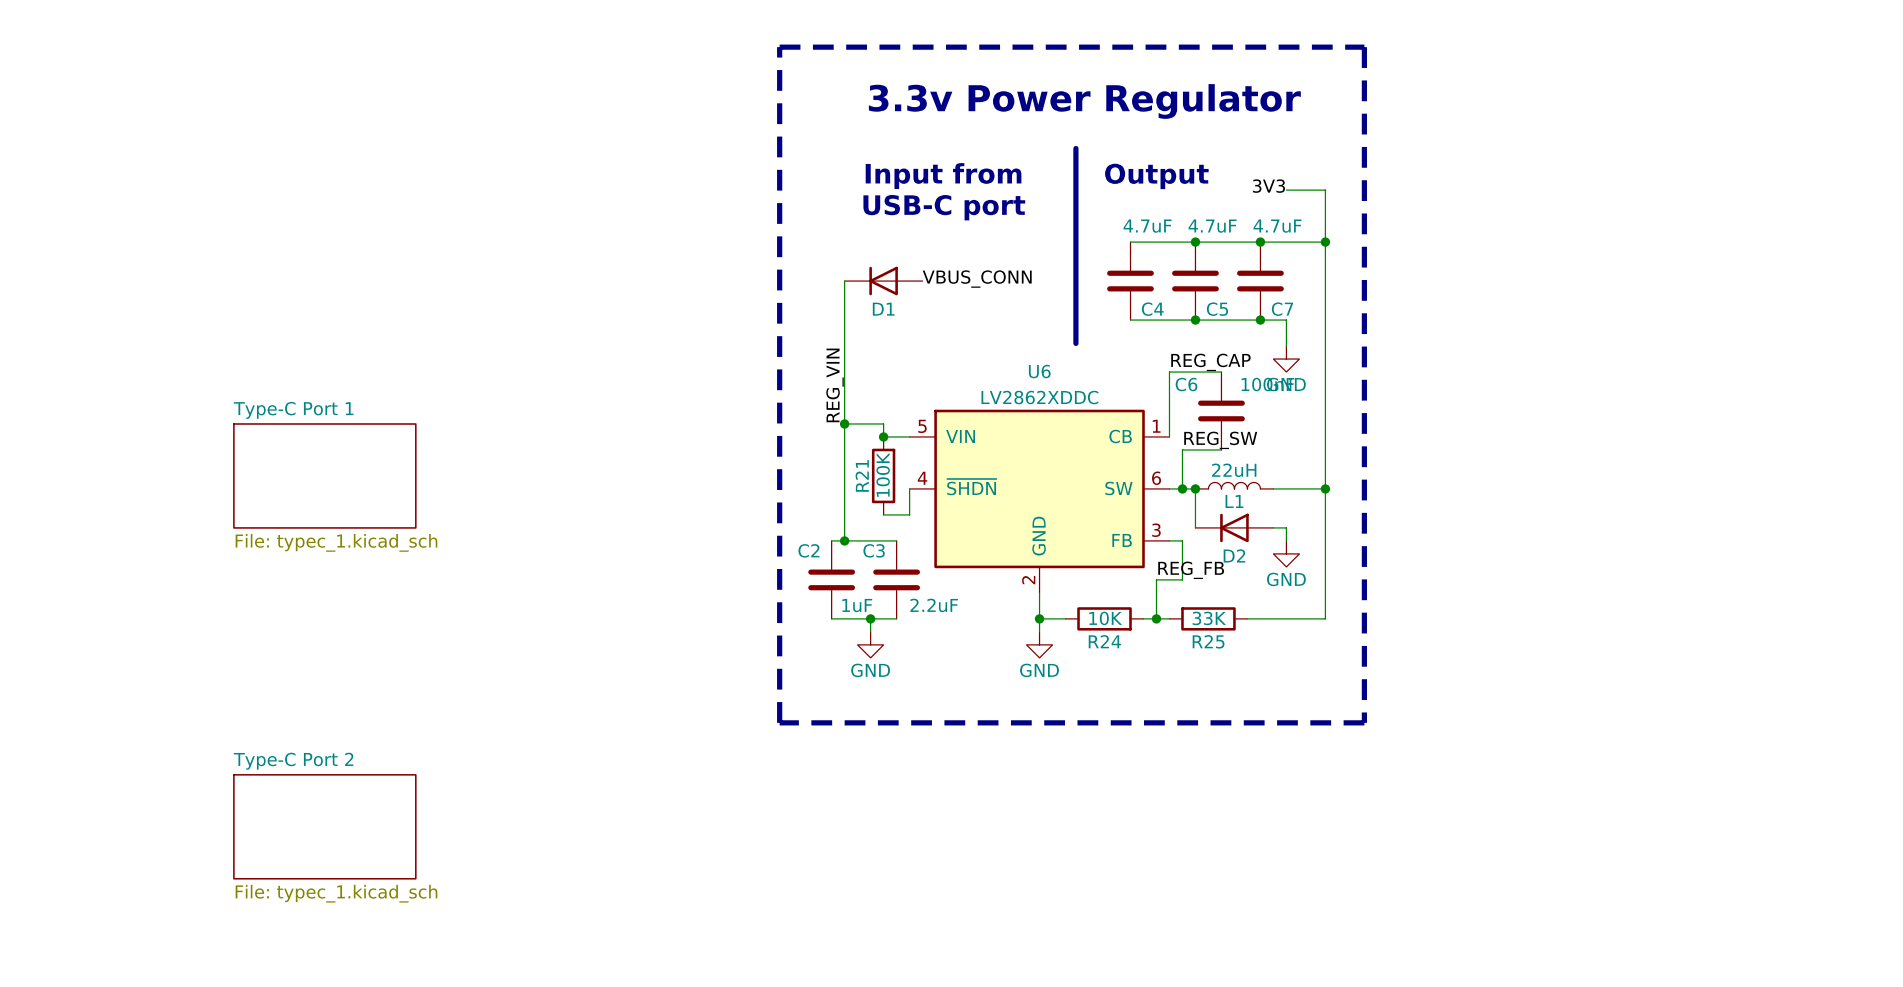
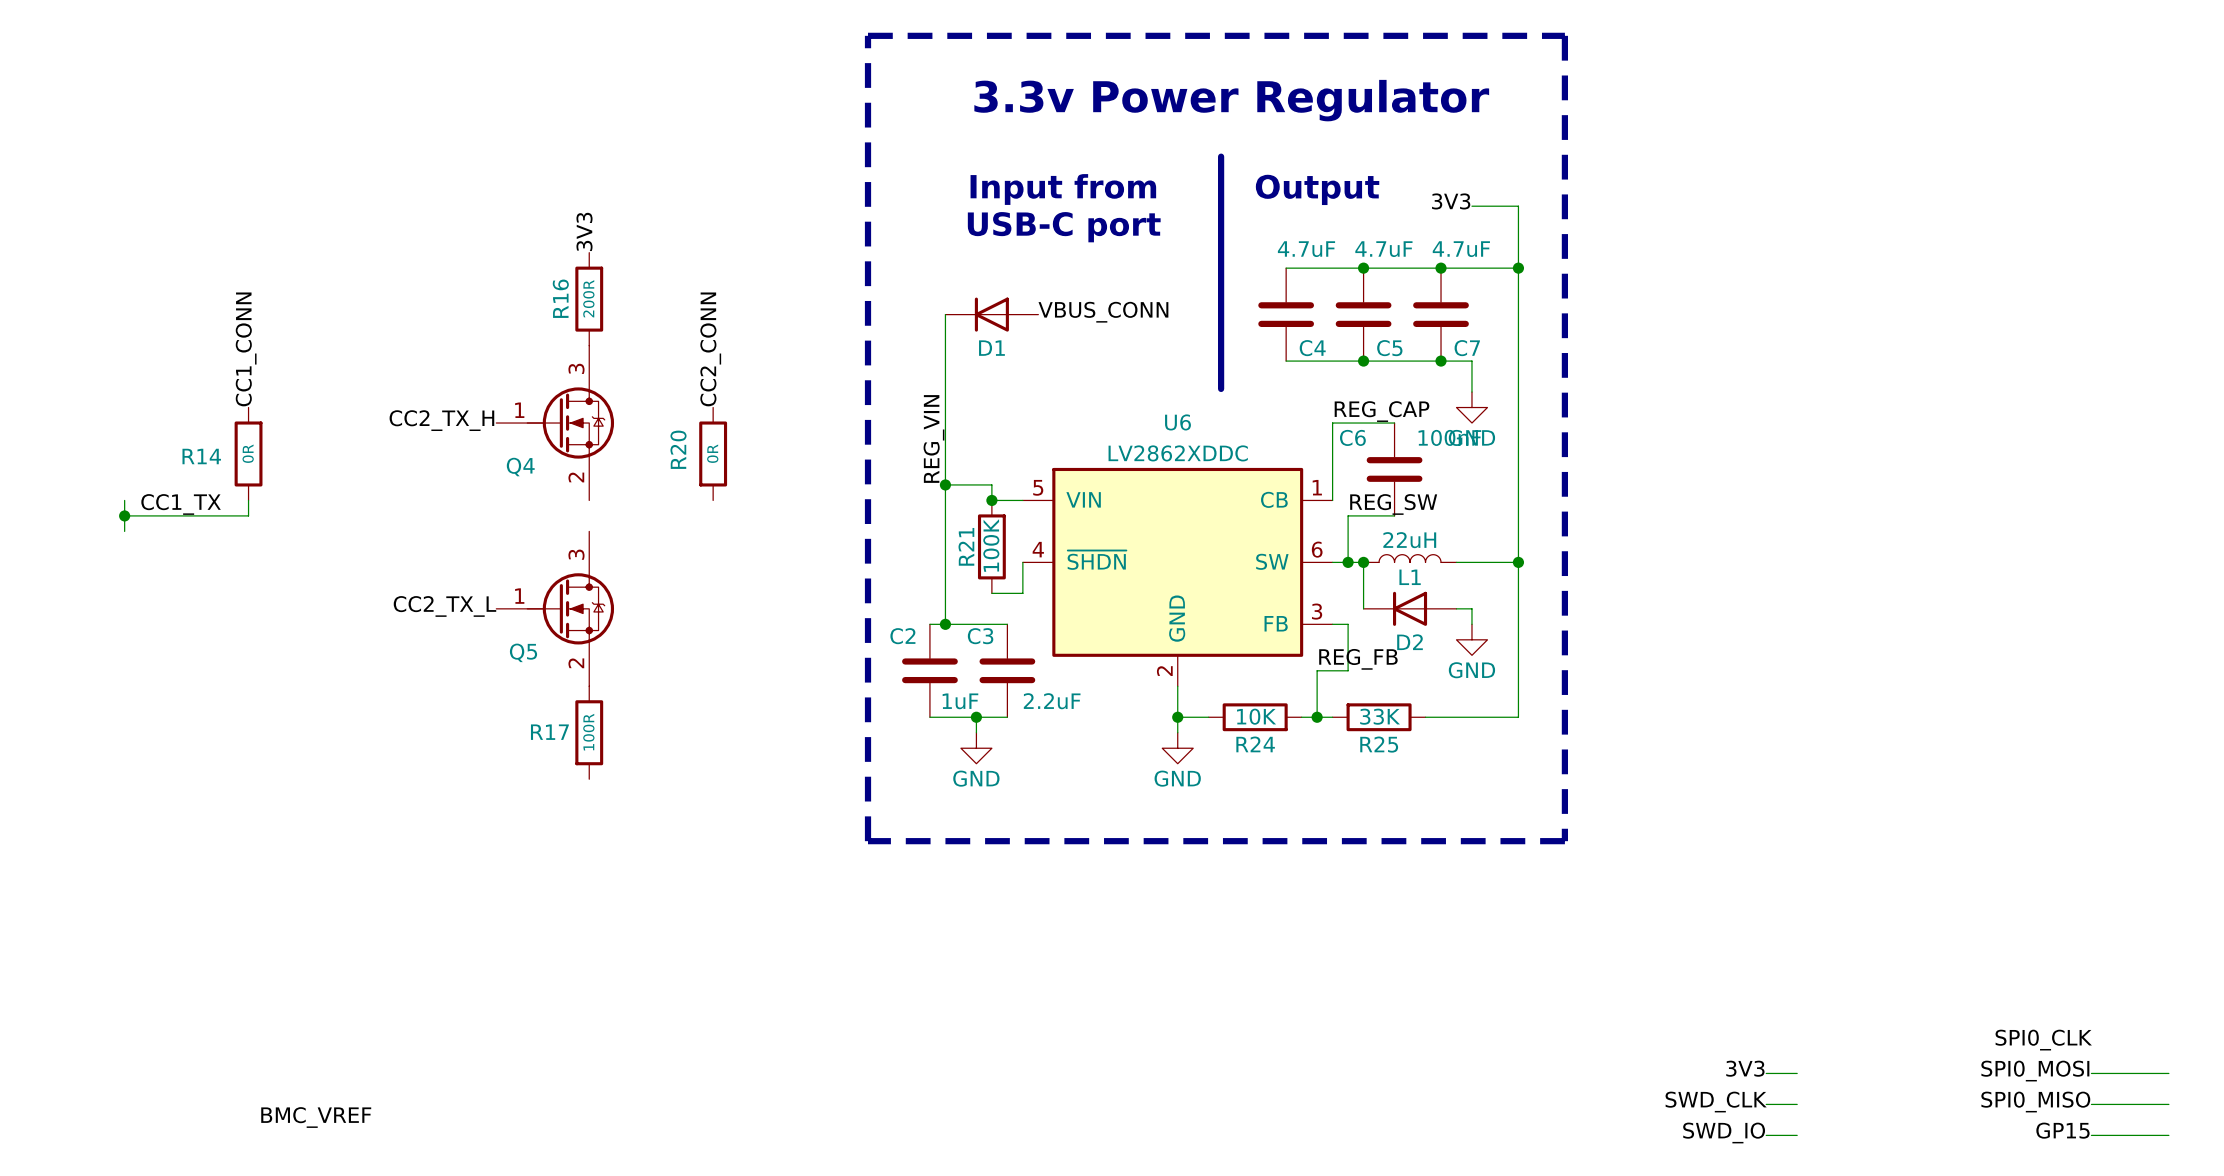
label: none -> 3V3 (584, 231)
R16: none -> 200R (589, 299)
label: none -> CC1_CONN (246, 349)
label: none -> CC2_CONN (710, 349)
label: none -> CC2_TX_H (441, 420)
Q4: none -> (555, 423)
R14: none -> 0R (248, 453)
R20: none -> 0R (713, 453)
wire: none -> (124, 500) (124, 531)
wire: none -> (248, 500) (248, 515) (124, 515)
label: none -> CC1_TX (181, 504)
junction: none -> (124, 515)
sheet Type-C Port 1: File: typec_1.kicad_sch (324, 475) -> none
label: none -> CC2_TX_L (444, 606)
Q5: none -> (555, 608)
R17: none -> 100R (589, 732)
sheet Type-C Port 2: File: typec_1.kicad_sch (324, 826) -> none
label: none -> SPI0_CLK (2043, 1040)
label: none -> 3V3 (1745, 1068)
label: none -> SPI0_MOSI (2035, 1071)
wire: none -> (1766, 1073) (1797, 1073)
wire: none -> (2091, 1073) (2168, 1073)
label: none -> SWD_CLK (1716, 1102)
label: none -> SPI0_MISO (2035, 1102)
wire: none -> (1766, 1104) (1797, 1104)
wire: none -> (2091, 1104) (2168, 1104)
label: none -> BMC_VREF (316, 1117)
label: none -> GP15 (2062, 1130)
label: none -> SWD_IO (1724, 1133)
wire: none -> (1766, 1135) (1797, 1135)
wire: none -> (2091, 1135) (2168, 1135)

